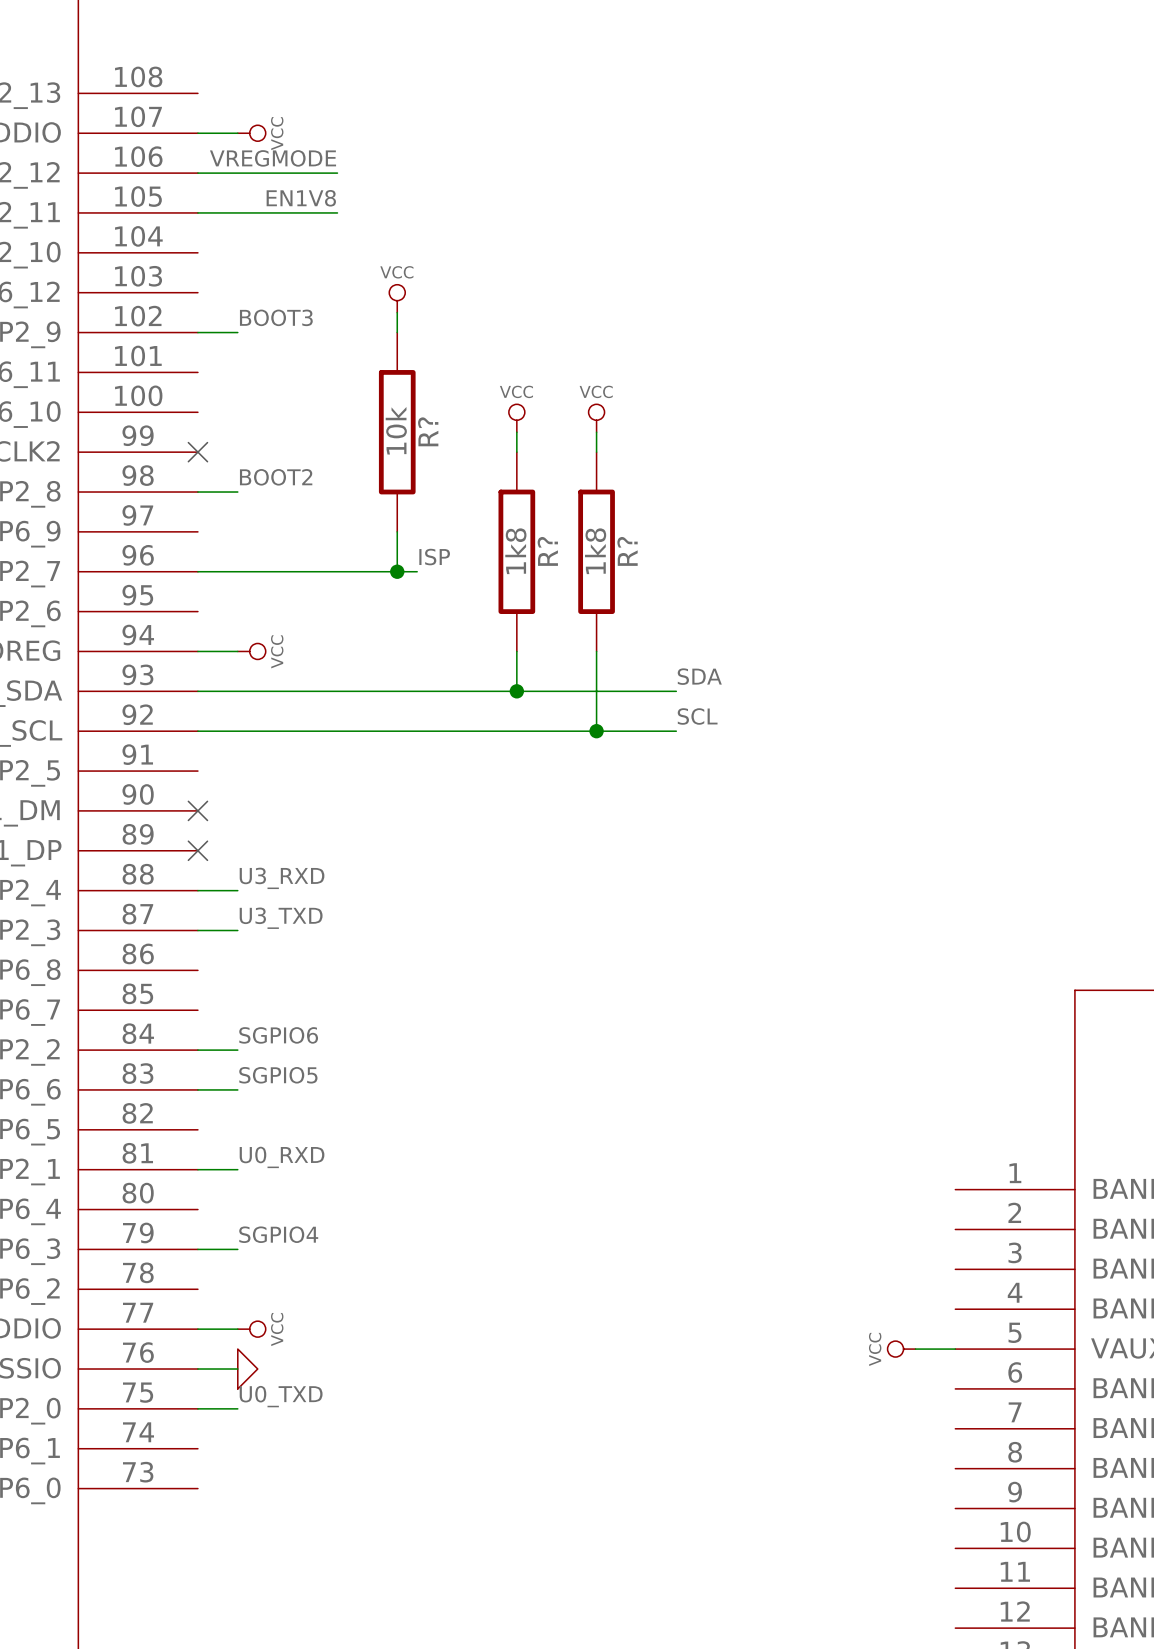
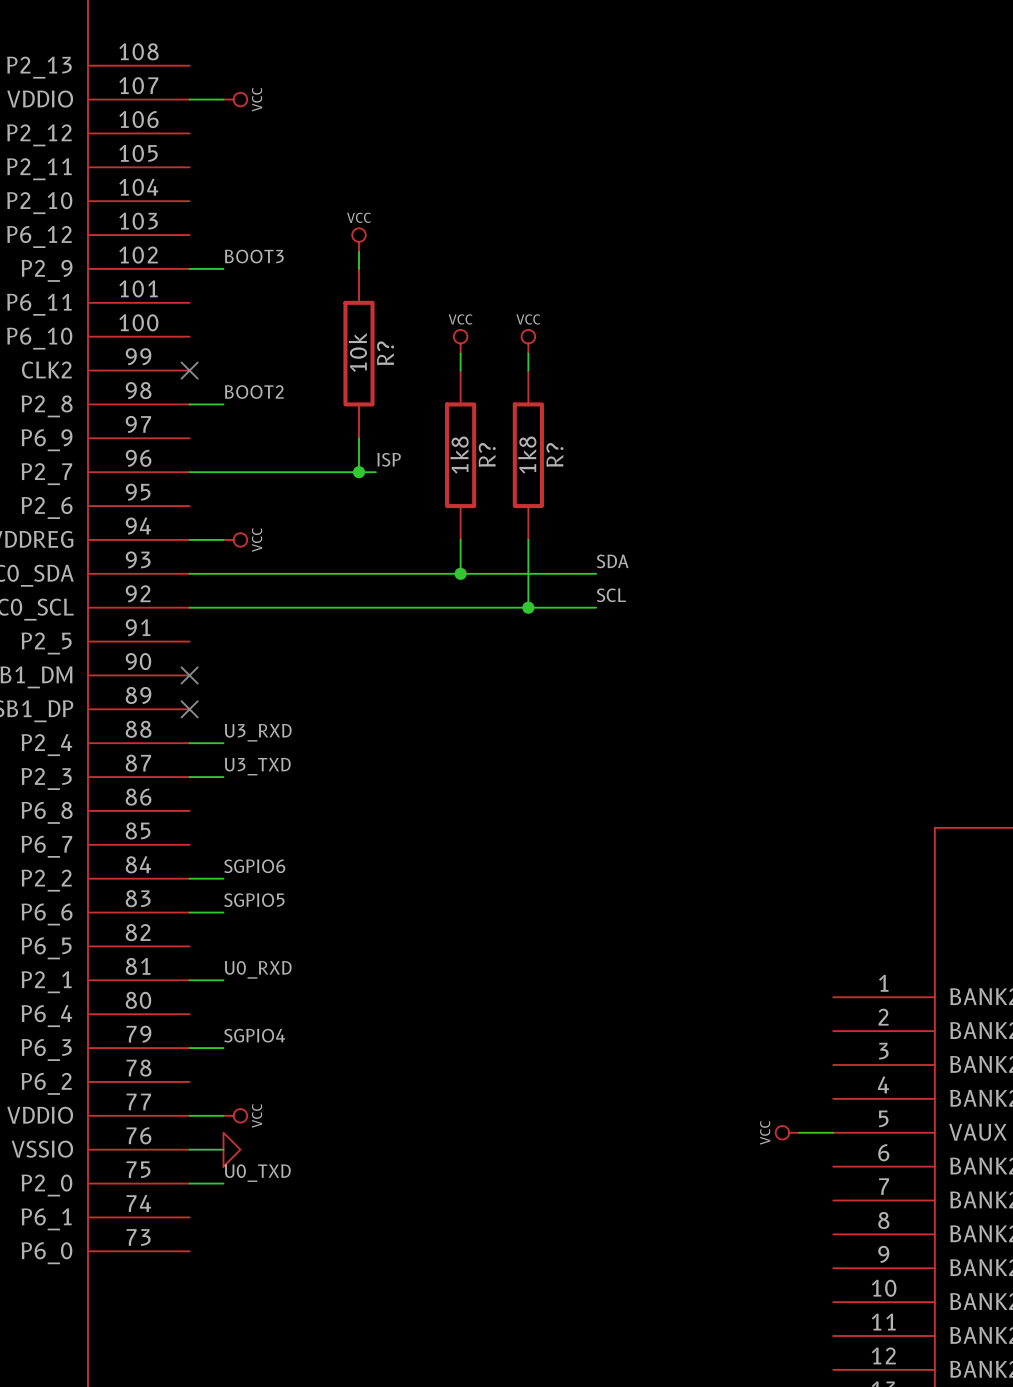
label: VREGMODE (273, 158) -> none
wire: (197, 173) (337, 173) -> none
label: EN1V8 (301, 198) -> none
wire: (197, 212) (337, 212) -> none

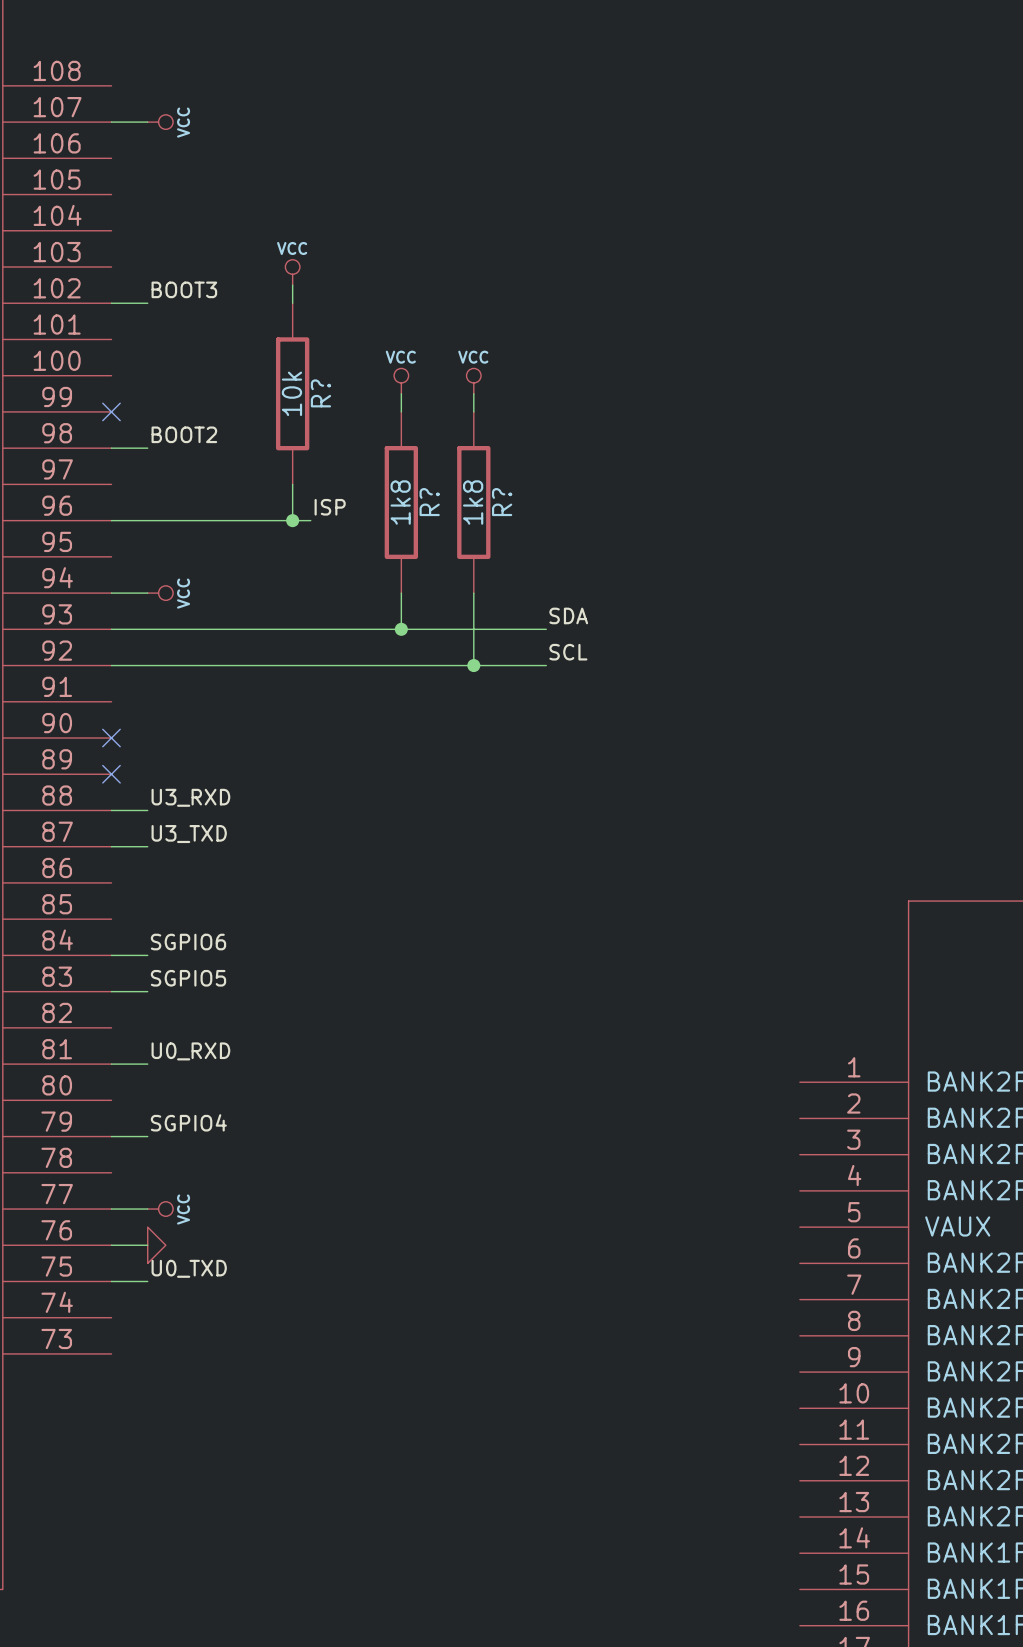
power symbol: VCC (787, 1132) -> none
wire: (799, 1132) (833, 1132) -> none

